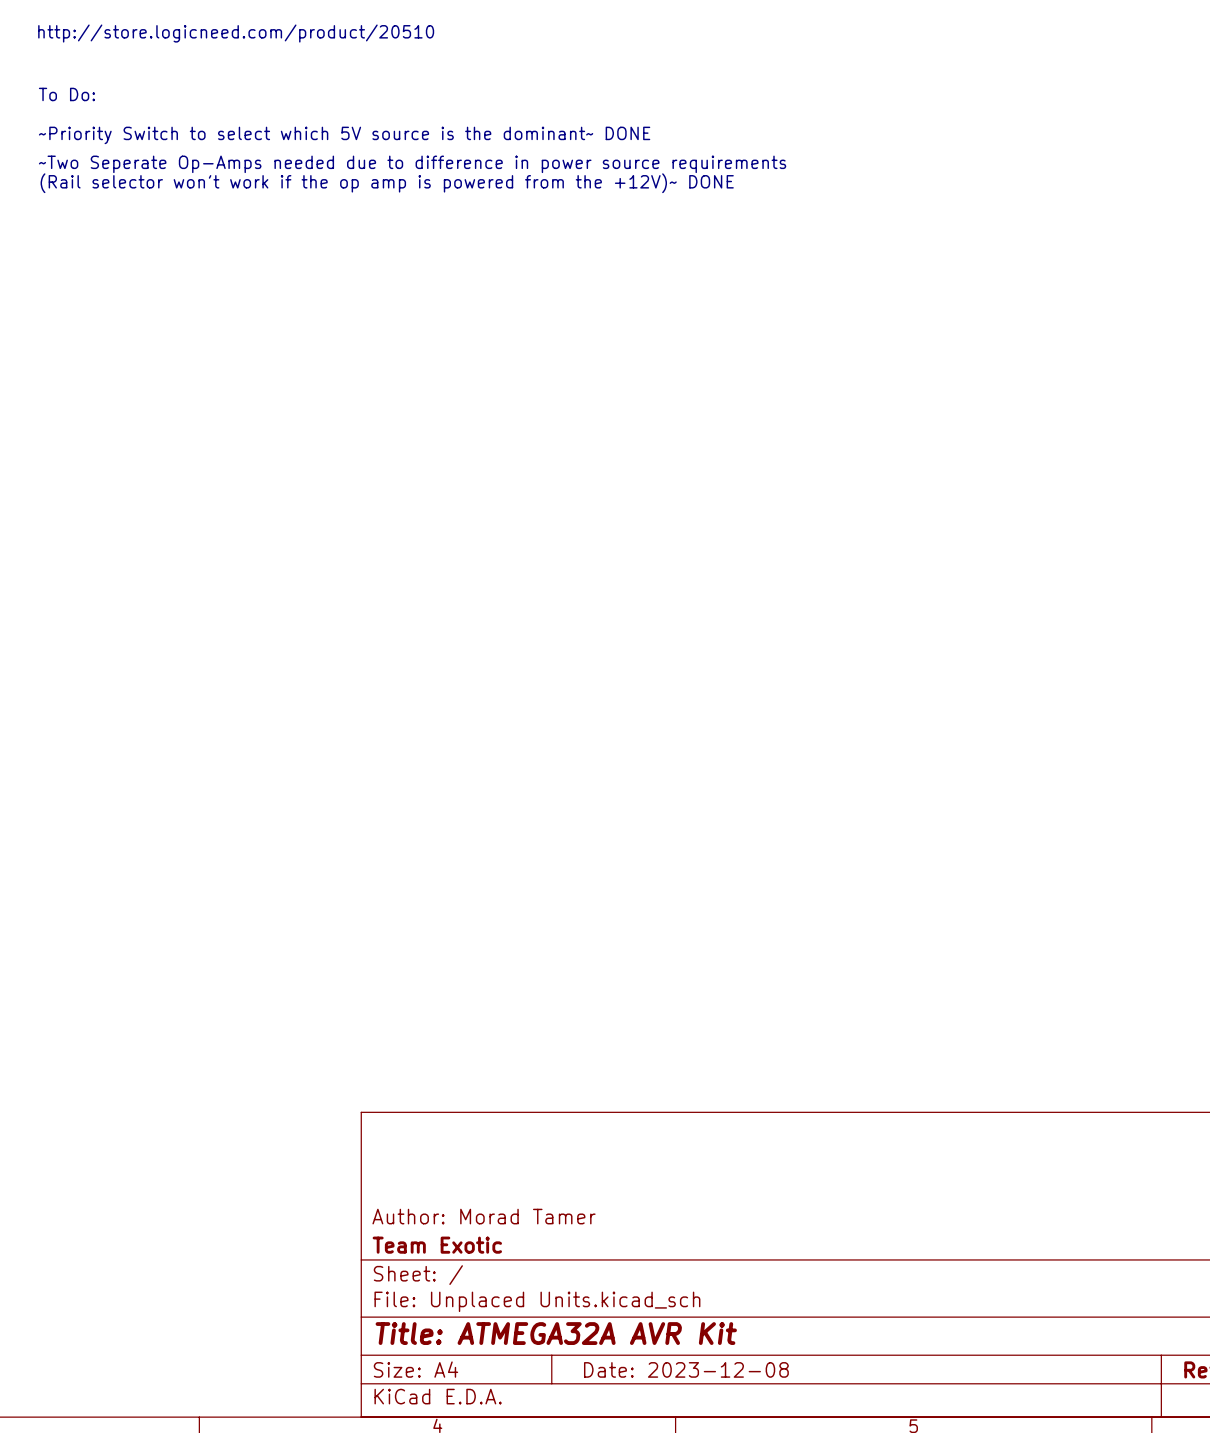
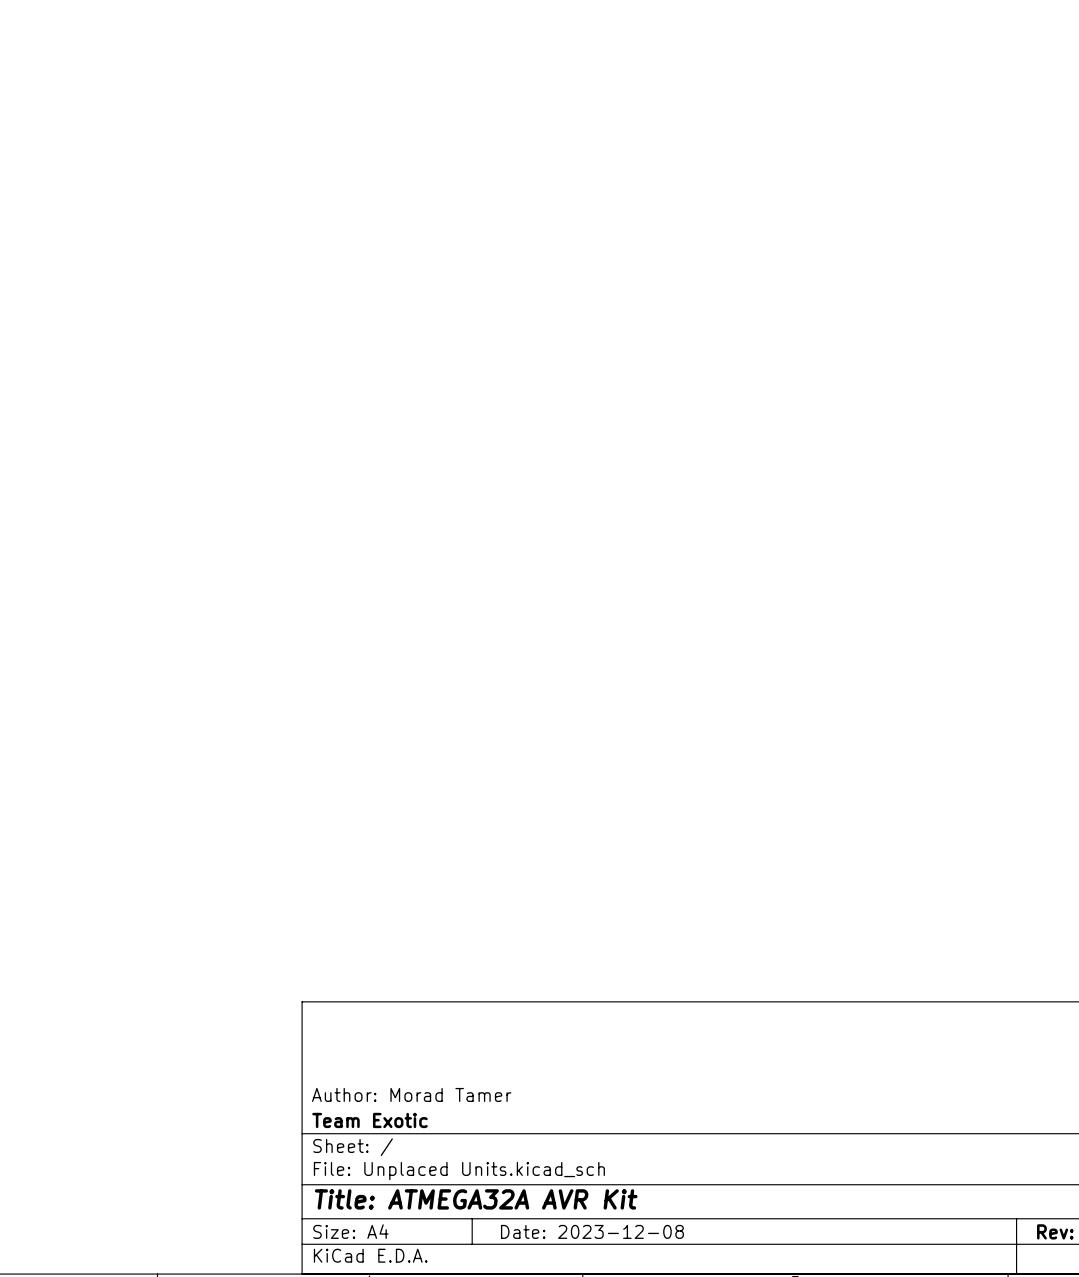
text: http://store.logicneed.com/product/20510 (236, 33) -> none
text: To Do: (66, 94) -> none
text: ~Priority Switch to select which 5V source is the dominant~ DONE (344, 135) -> none
text: ~Two Seperate Op-Amps needed due to difference in power source requirements (412, 164) -> none
text: (Rail selector won't work if the op amp is powered from the +12V)~ DONE (387, 183) -> none

